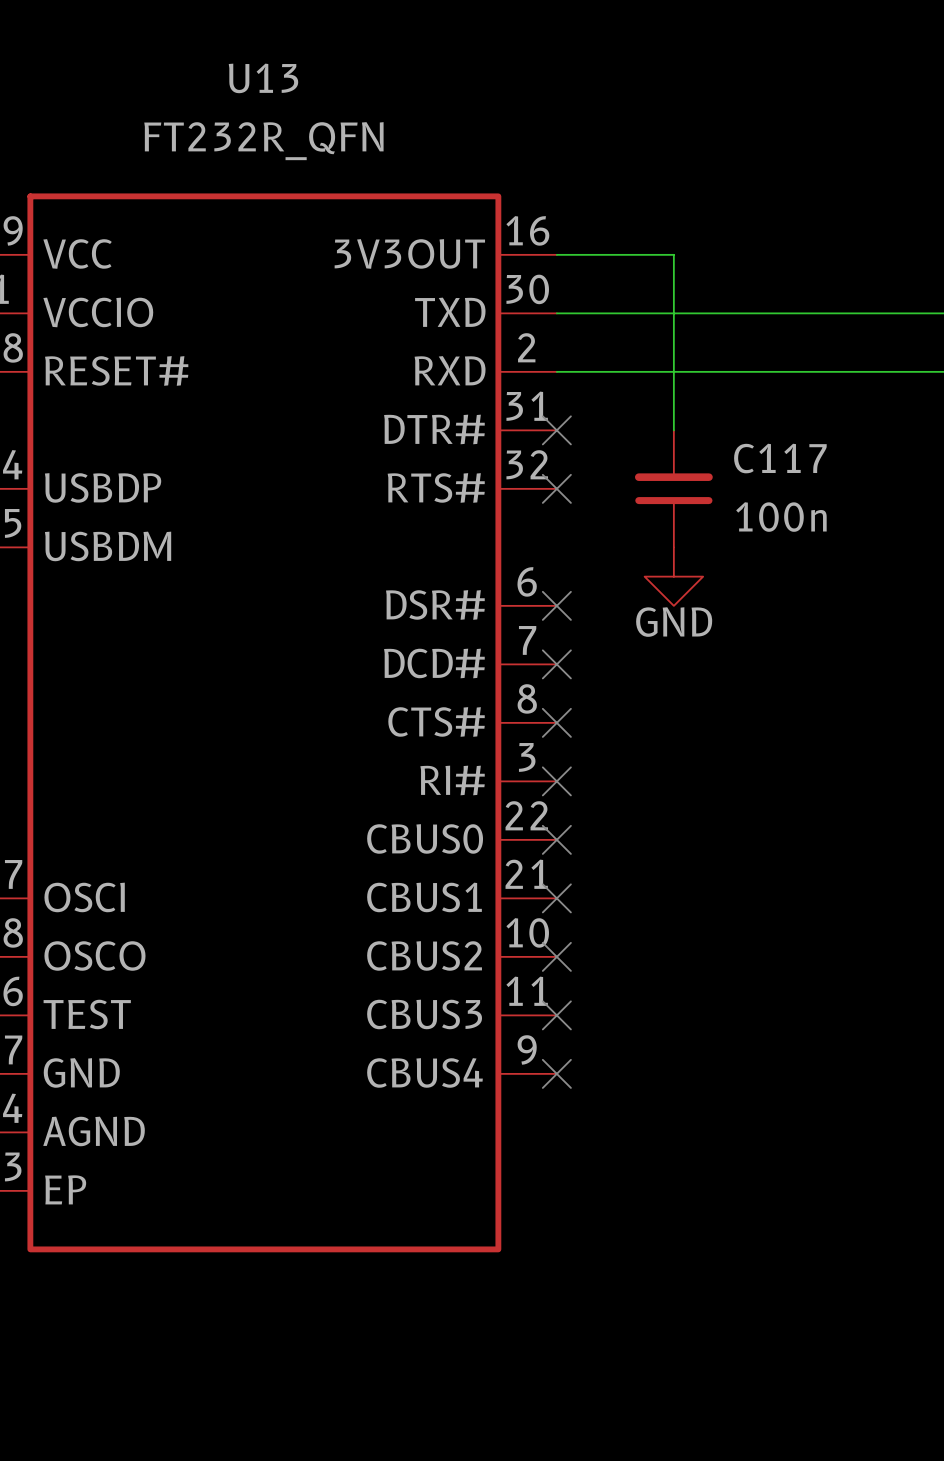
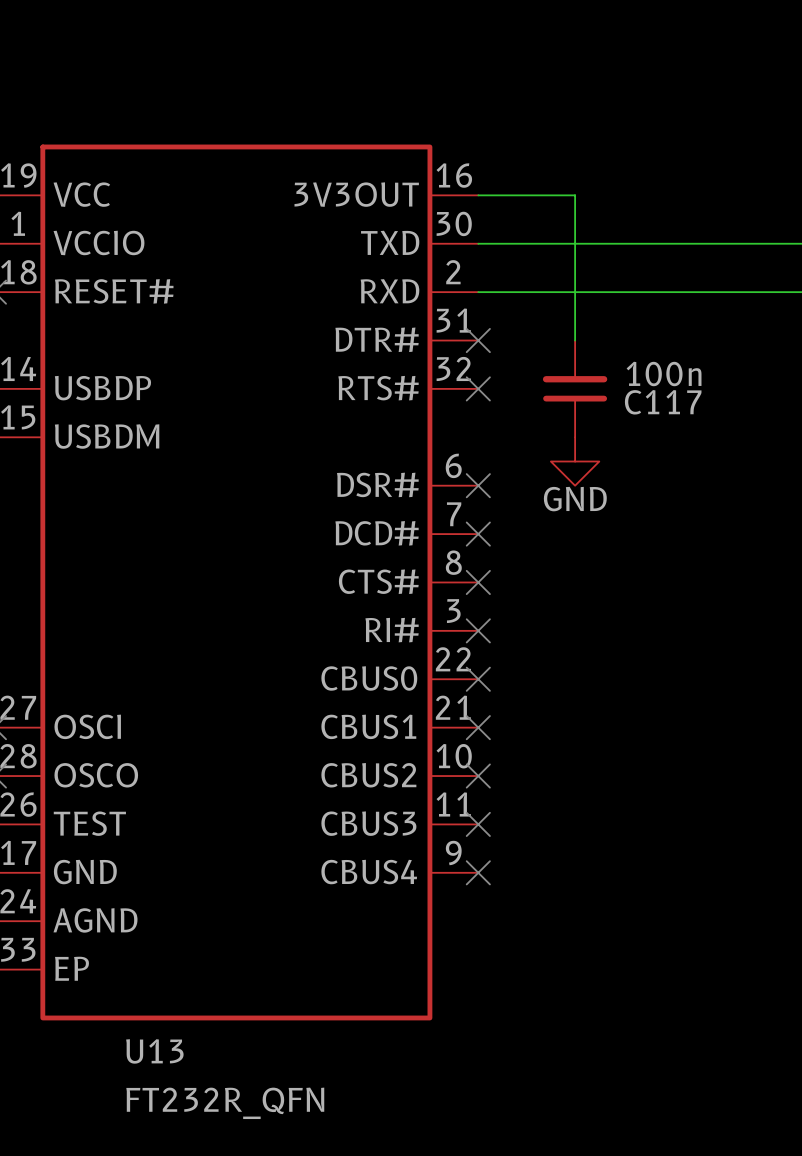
U13 name position: U13 (263, 78) -> U13 (154, 1051)
U13 value position: FT232R_QFN (263, 141) -> FT232R_QFN (225, 1103)
C117 name position: C117 (780, 458) -> C117 (663, 402)
C117 text position: 100n (781, 517) -> 100n (664, 373)

